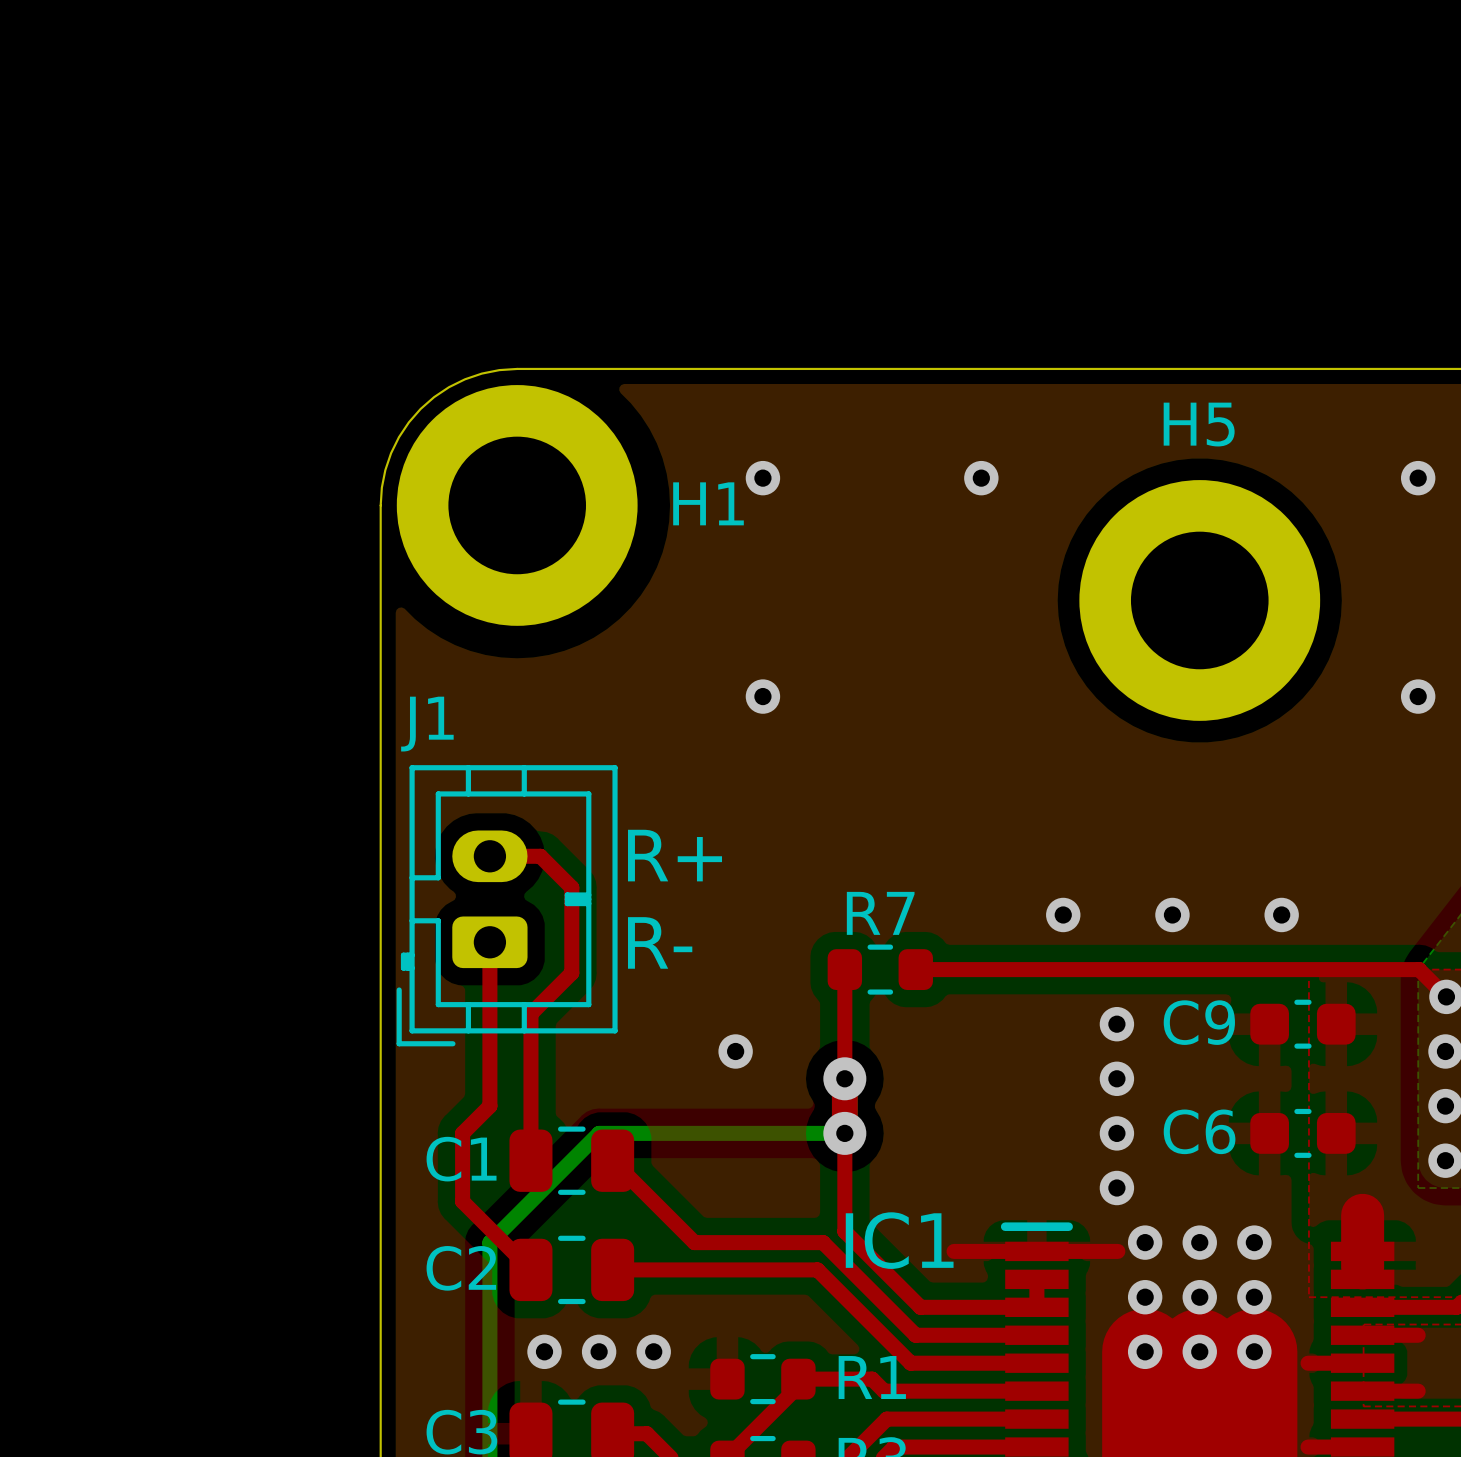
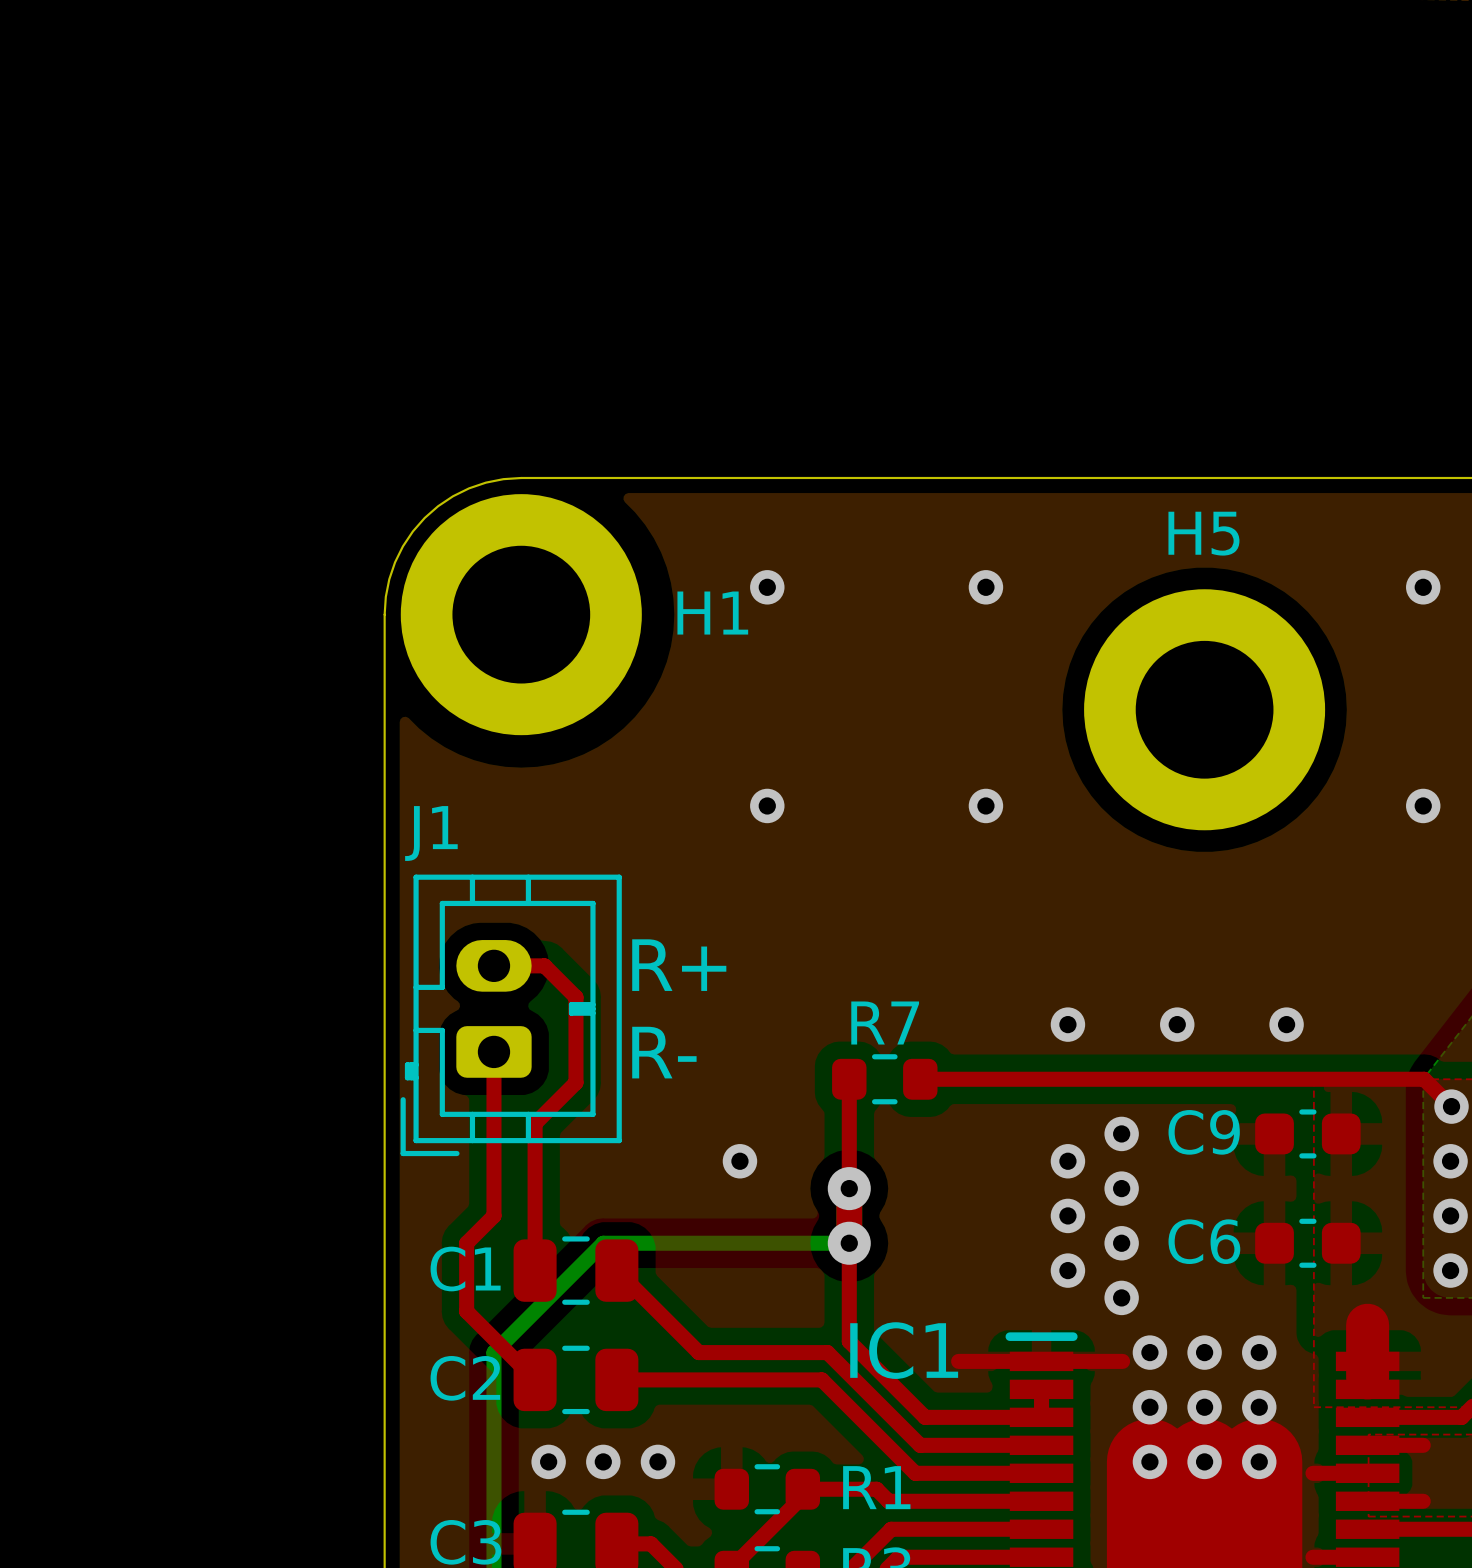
via: none -> (985, 805)
via: none -> (1067, 1161)
via: none -> (1067, 1215)
via: none -> (1067, 1270)

